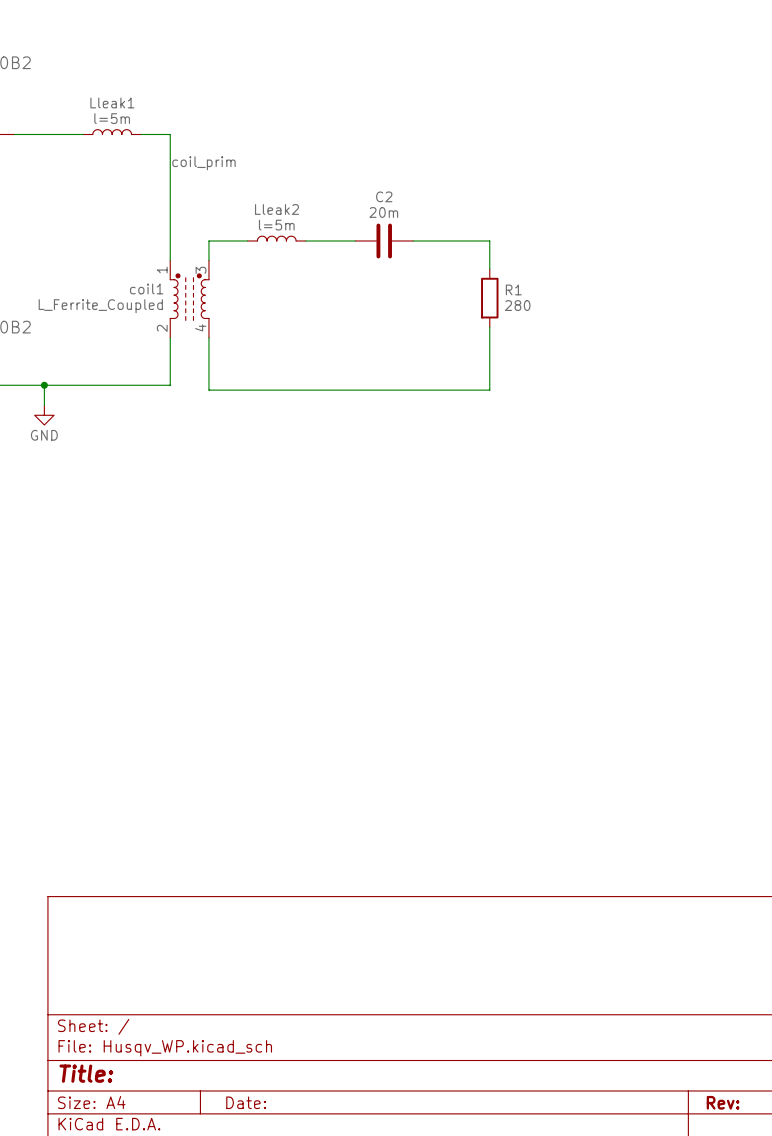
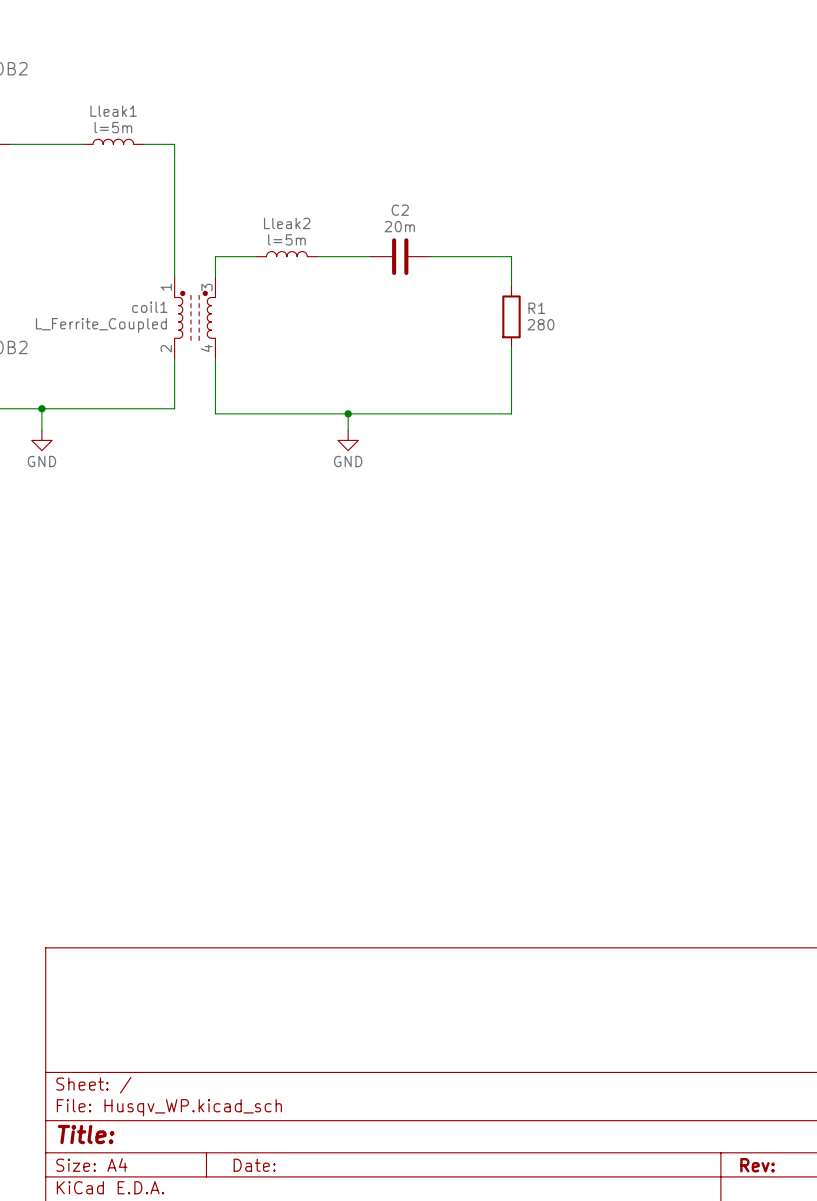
label: coil_prim (203, 163) -> none
wire: none -> (348, 413) (348, 430)
junction: none -> (348, 413)
power symbol: none -> GND (348, 440)

